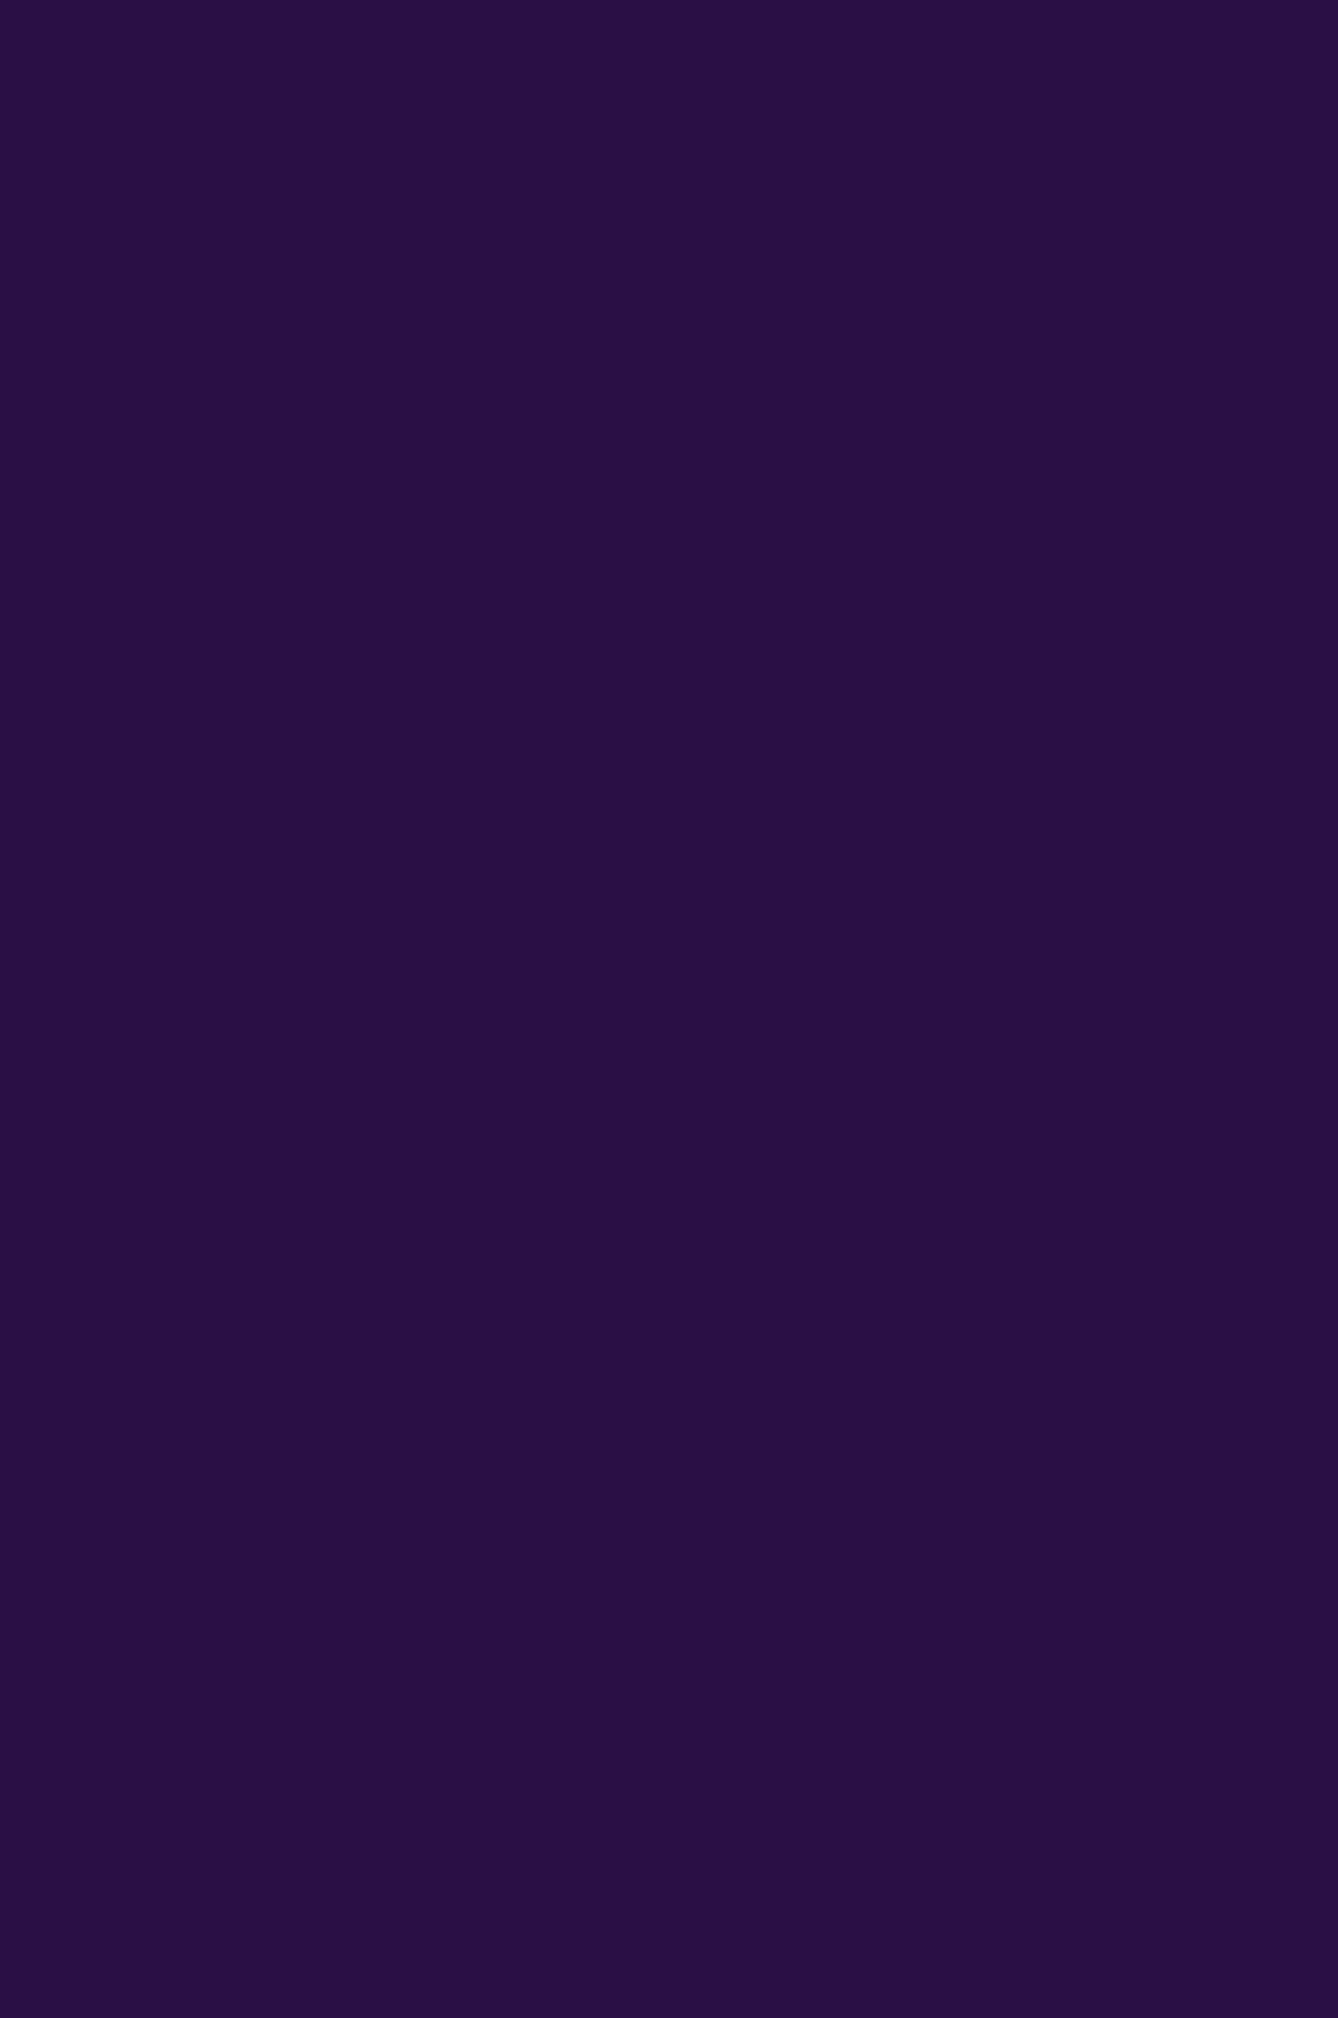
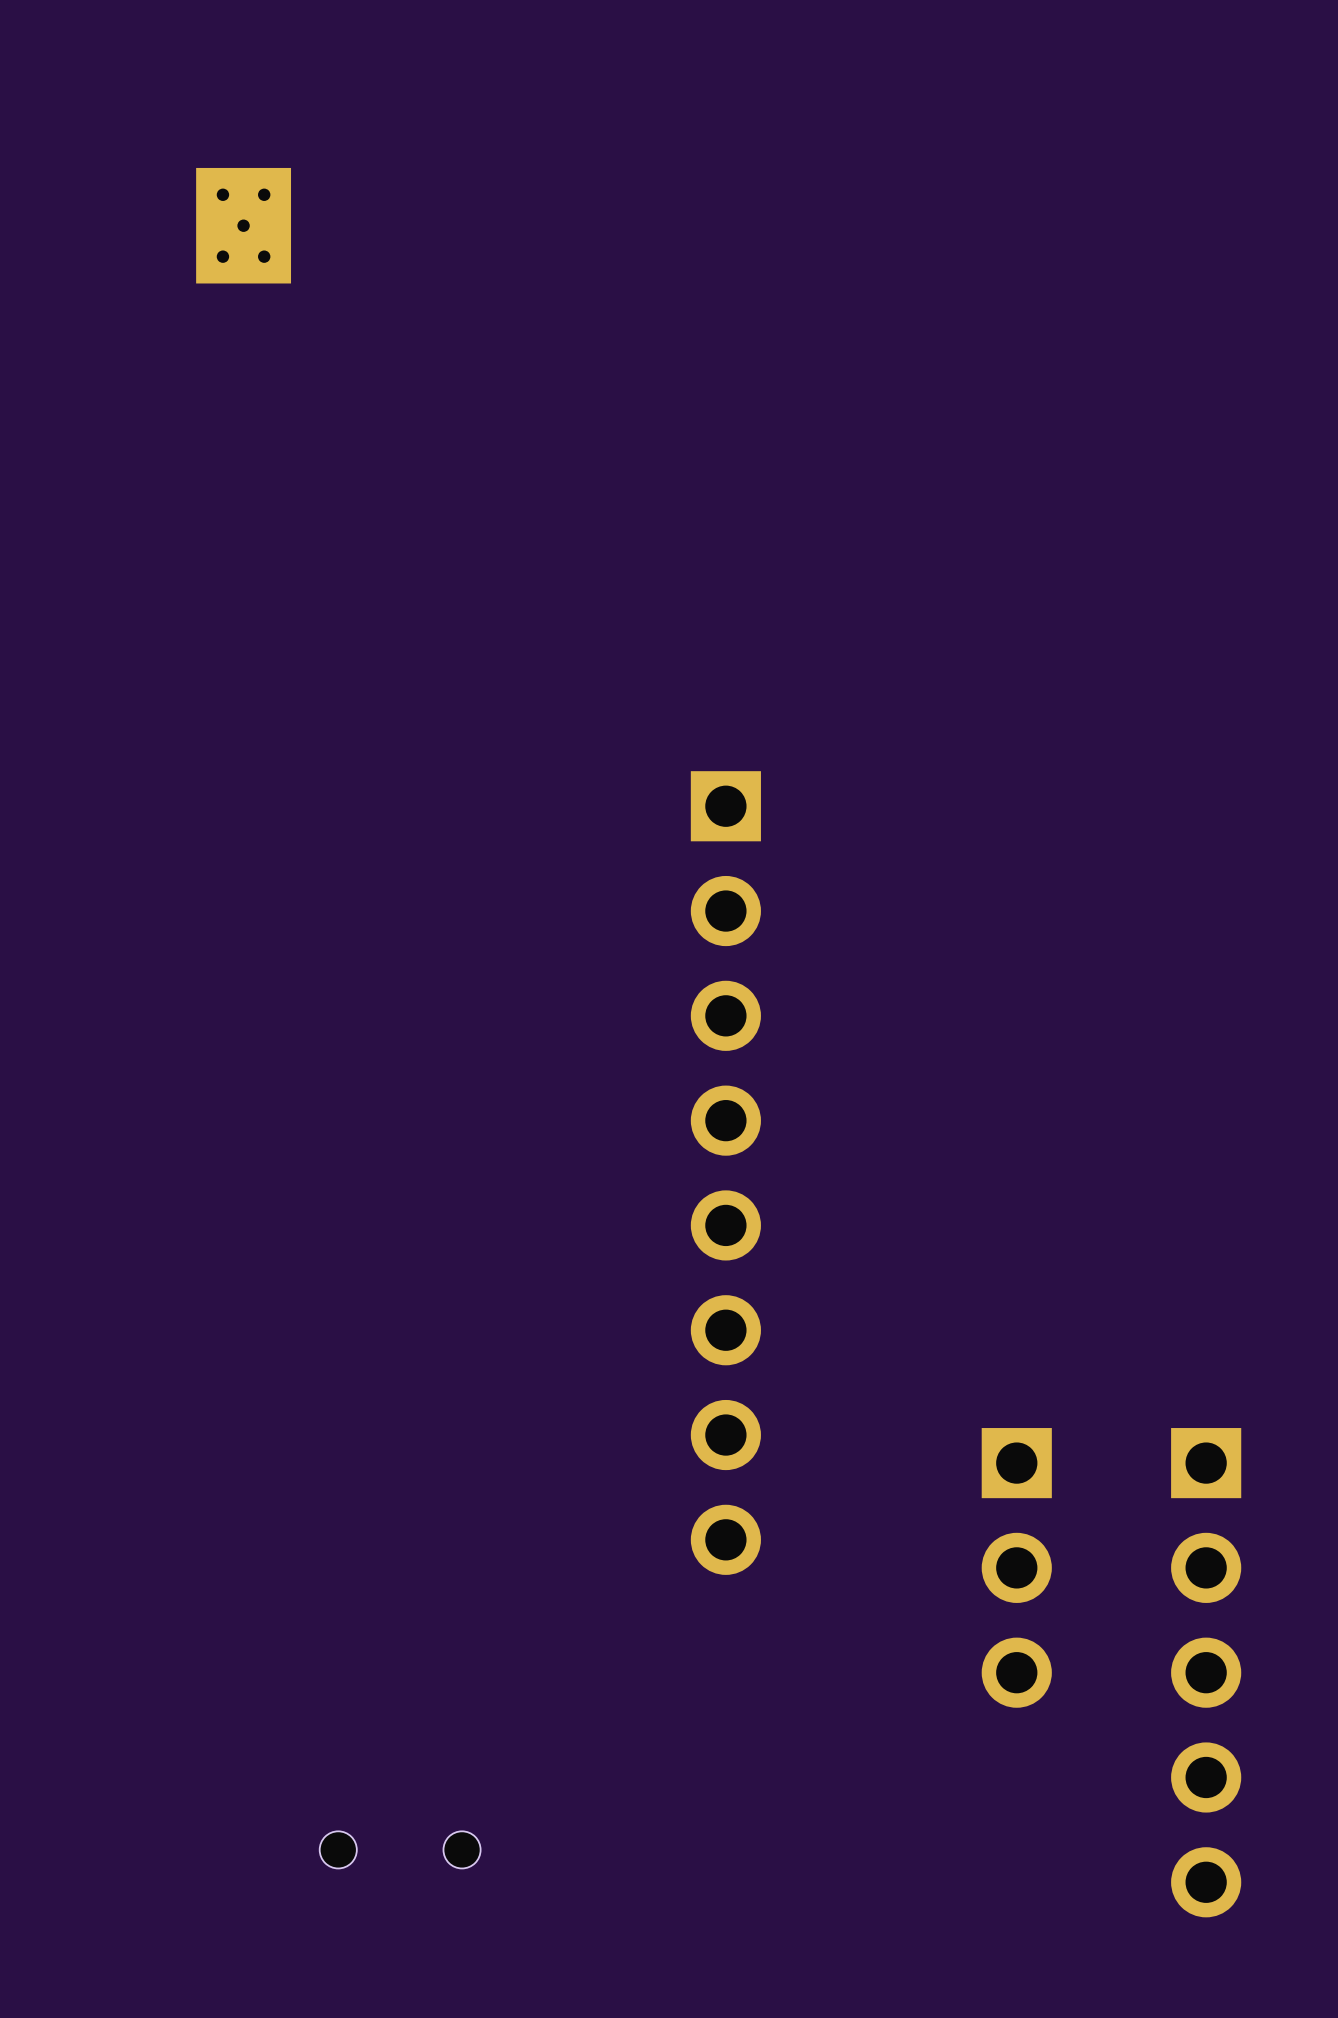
part: none -> (243, 225)
part: none -> (725, 1173)
part: none -> (1016, 1567)
part: none -> (1206, 1672)
part: none -> (400, 1849)

